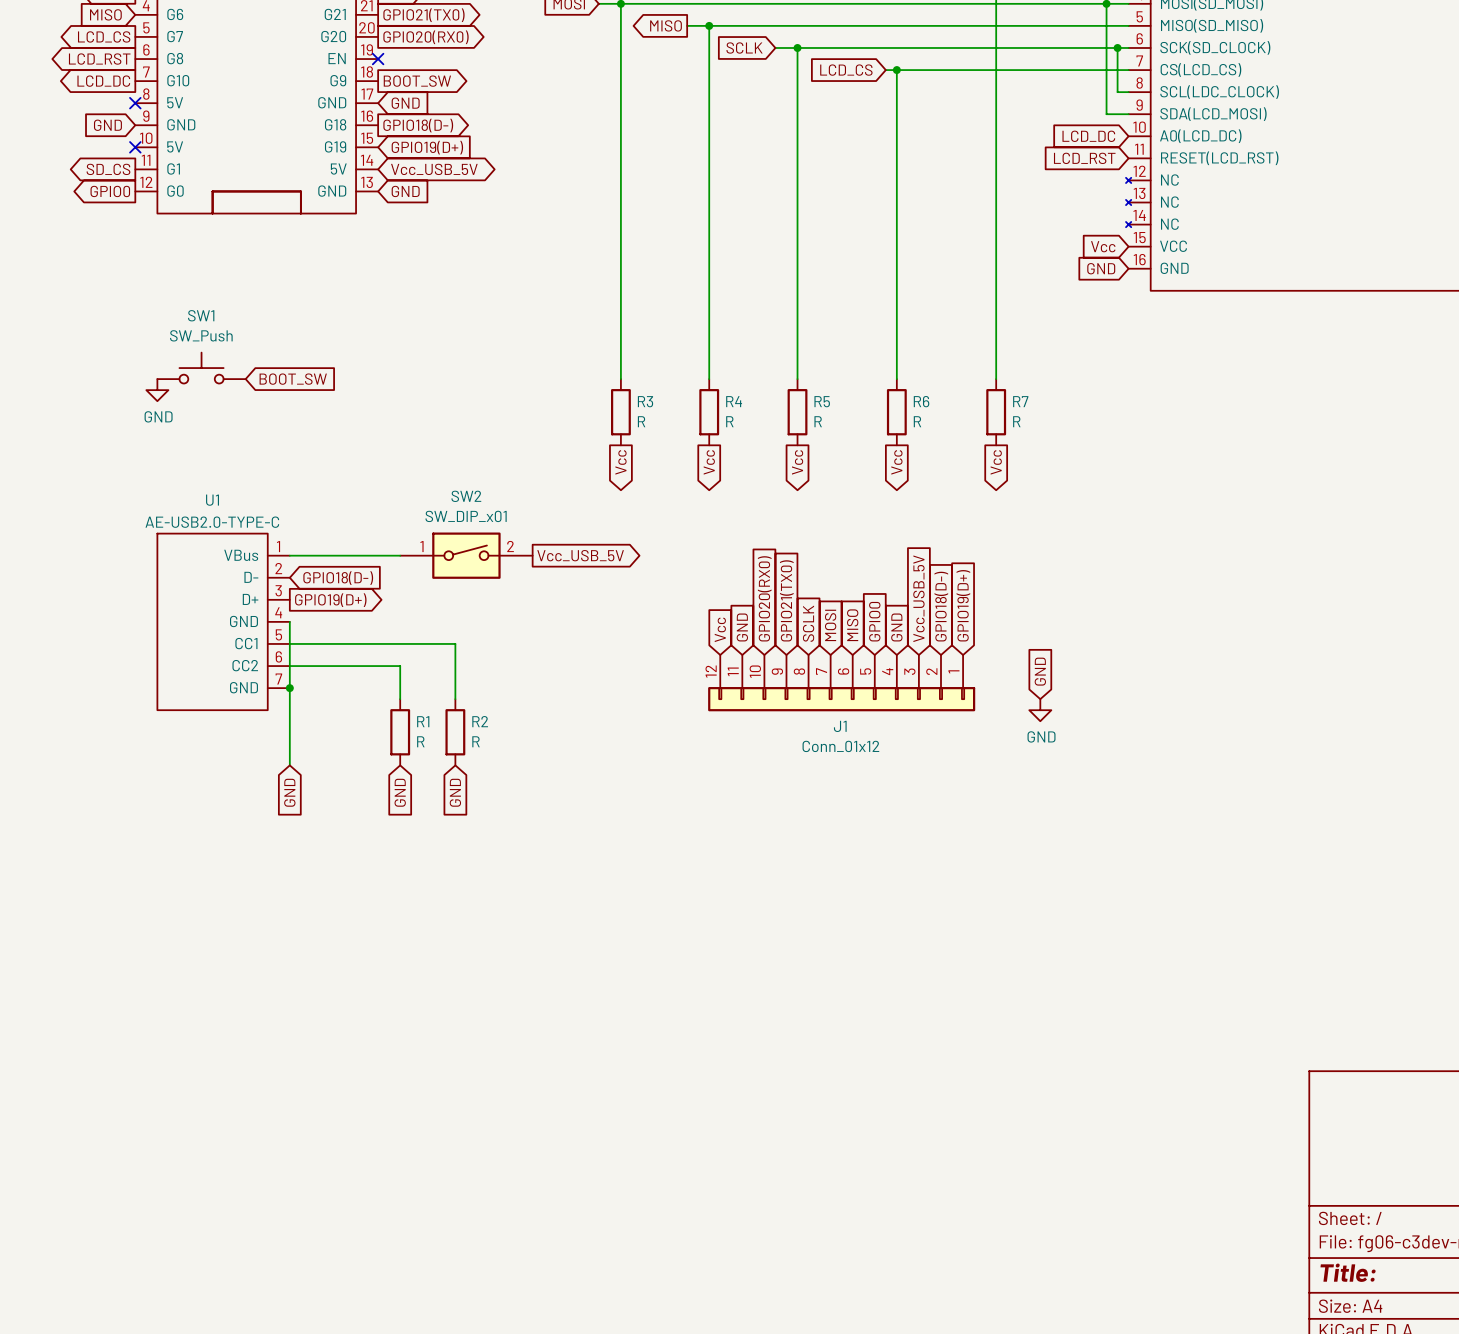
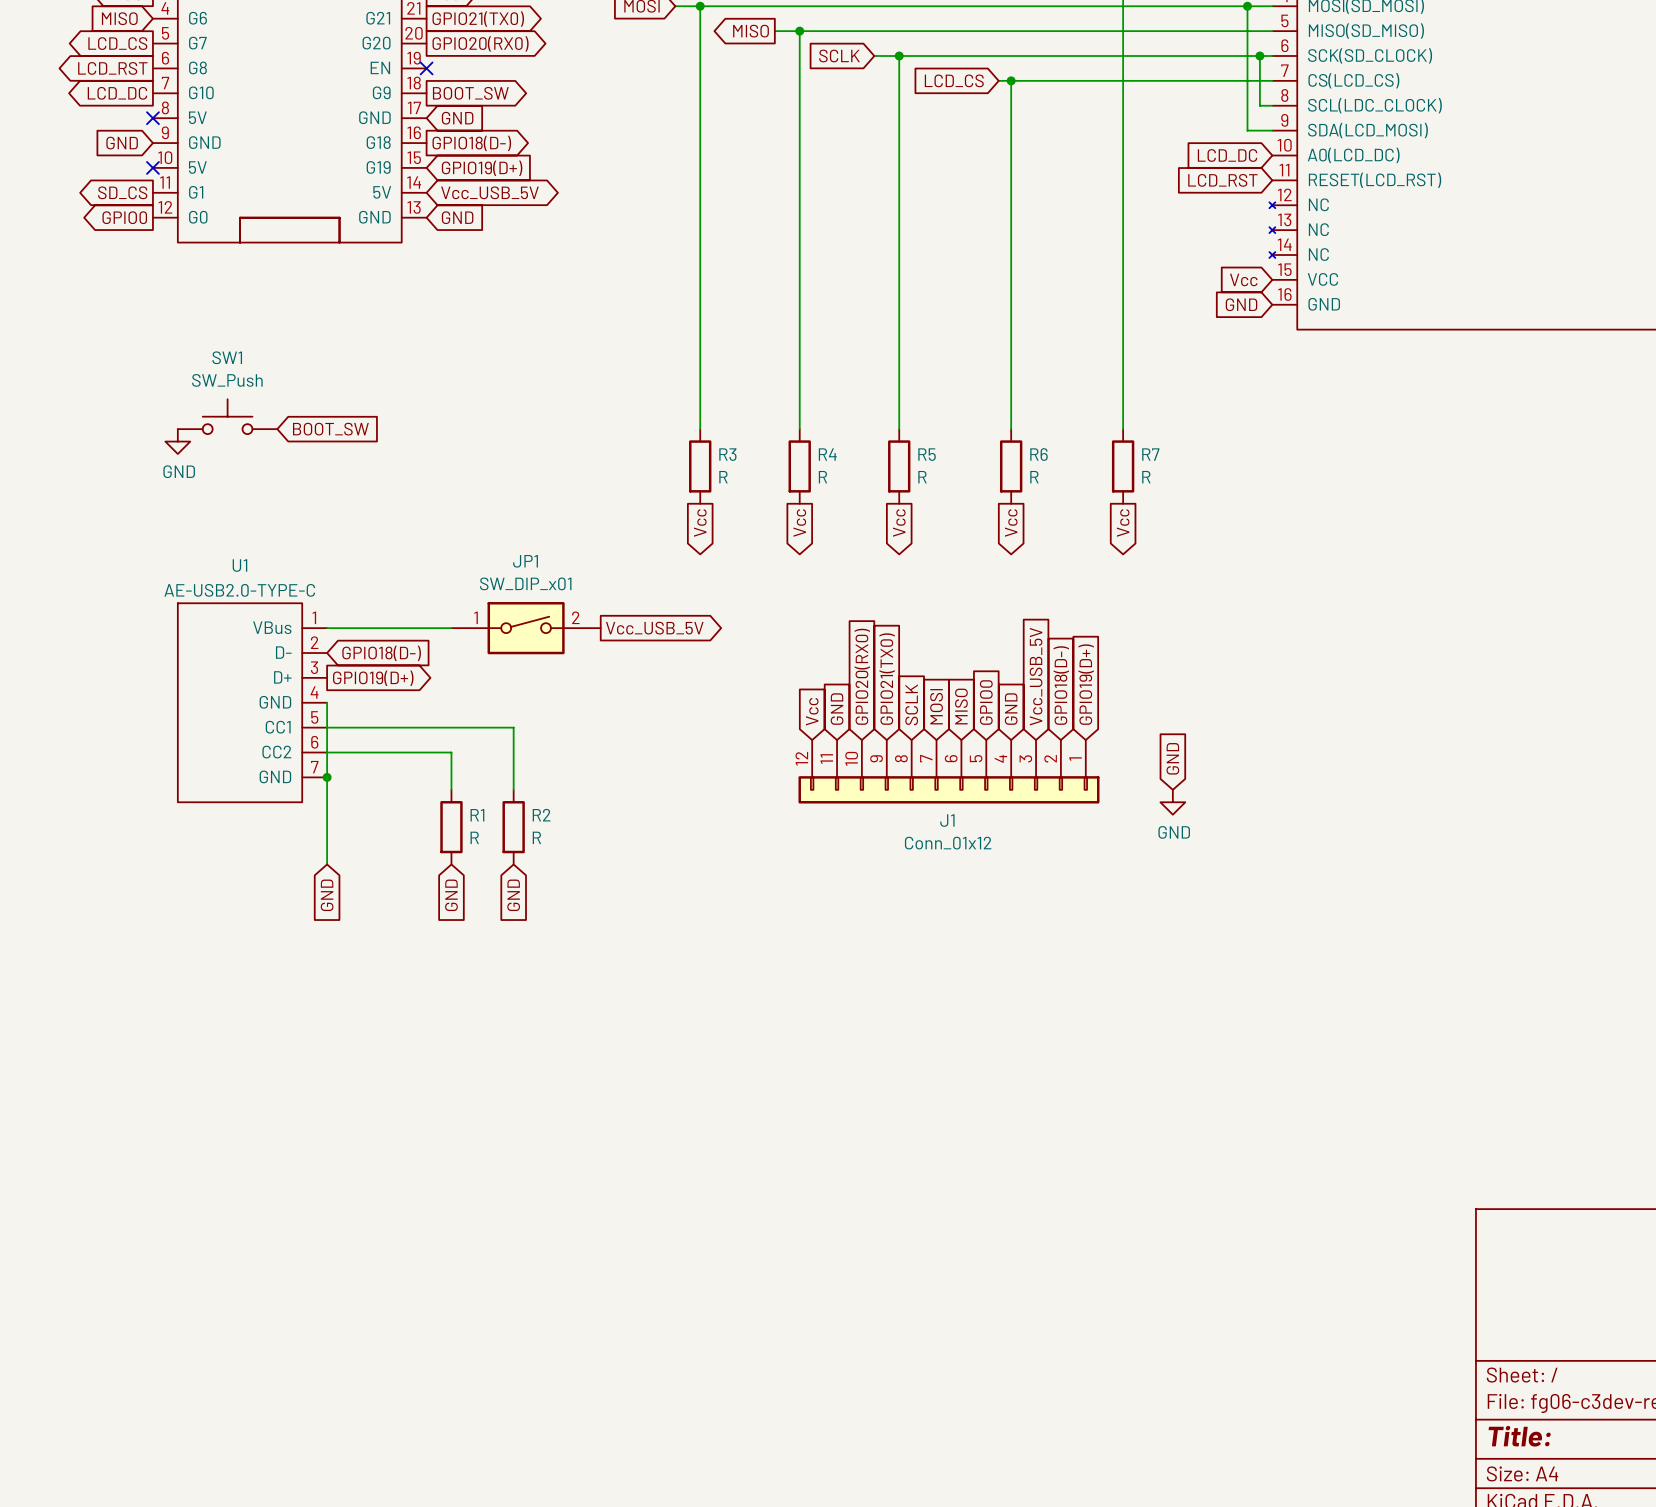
SW2 name: SW2 (466, 496) -> JP1 (525, 561)

